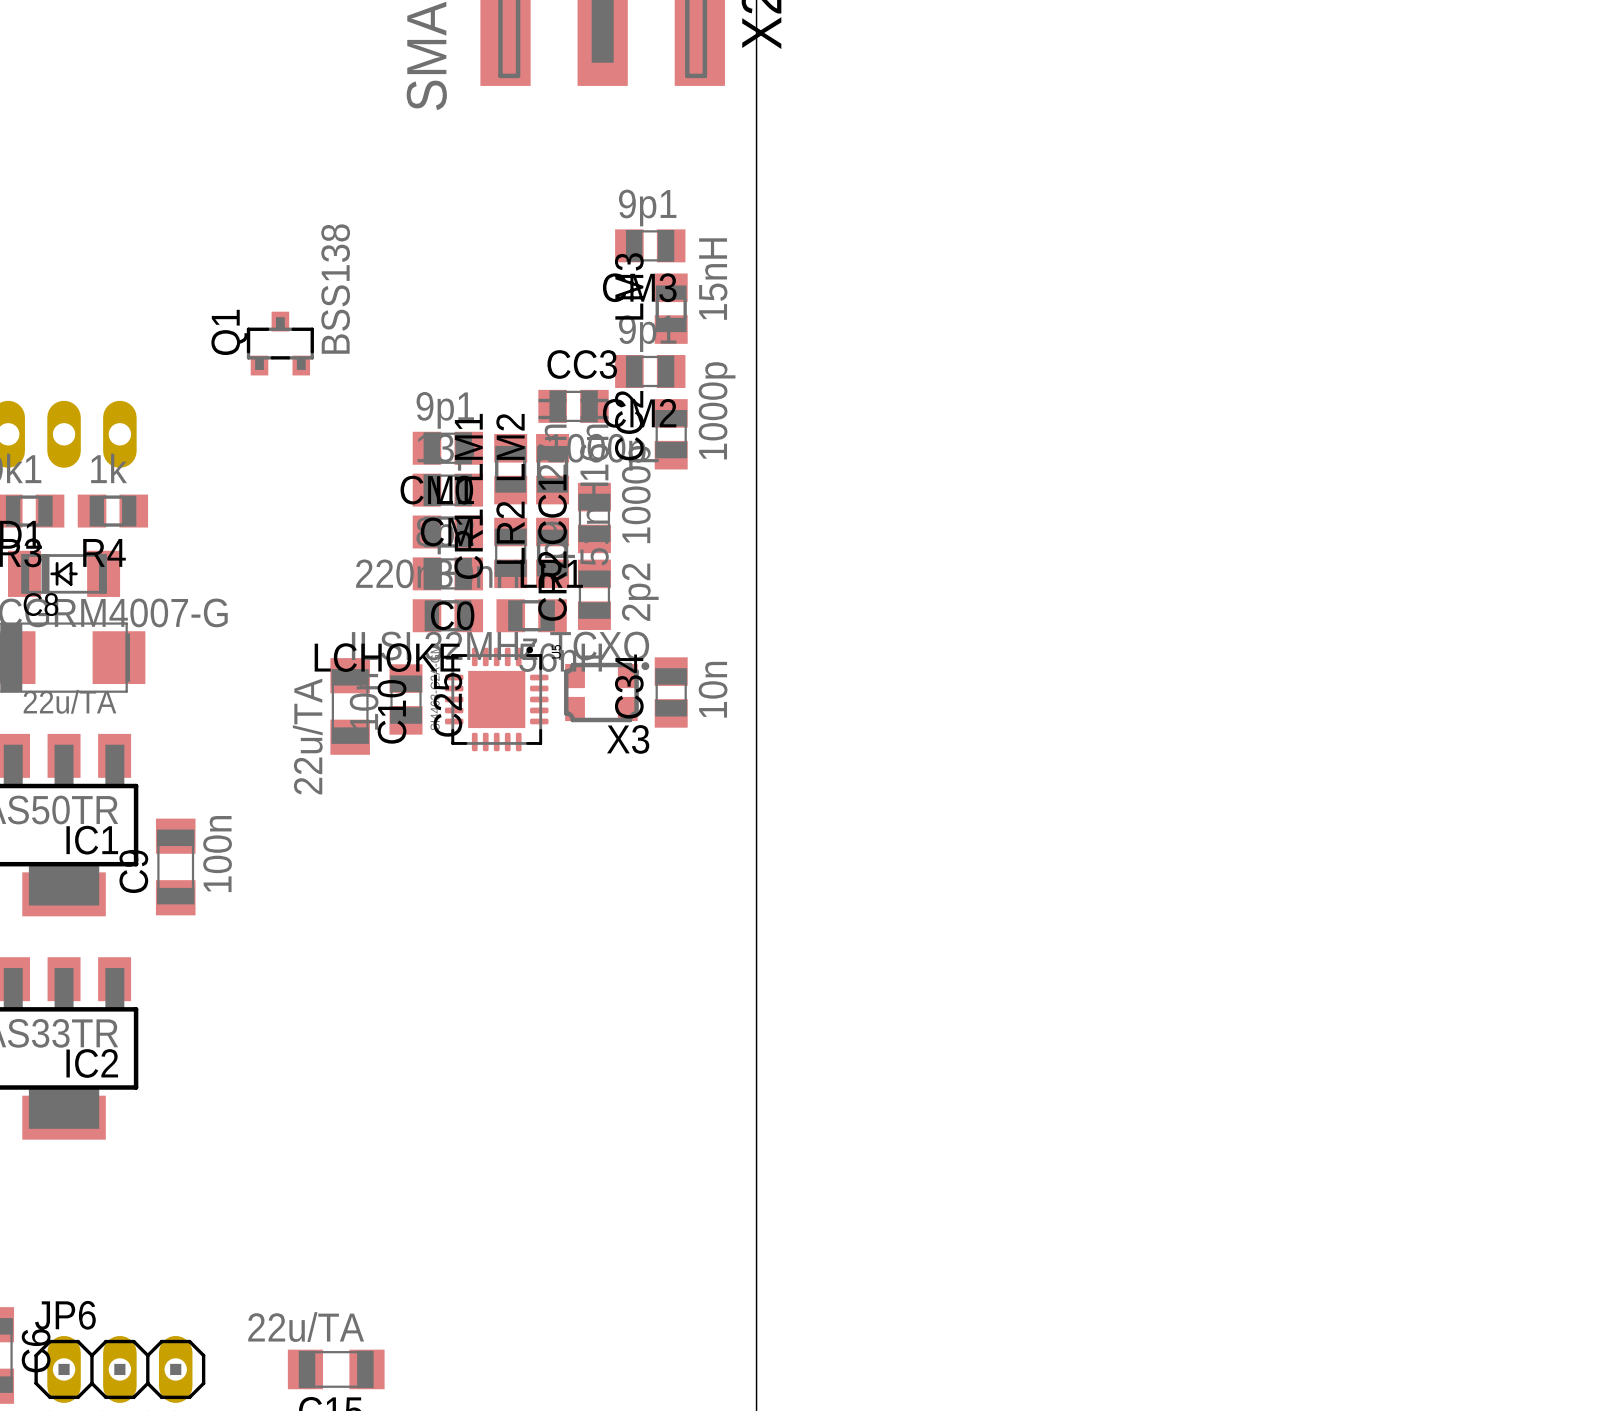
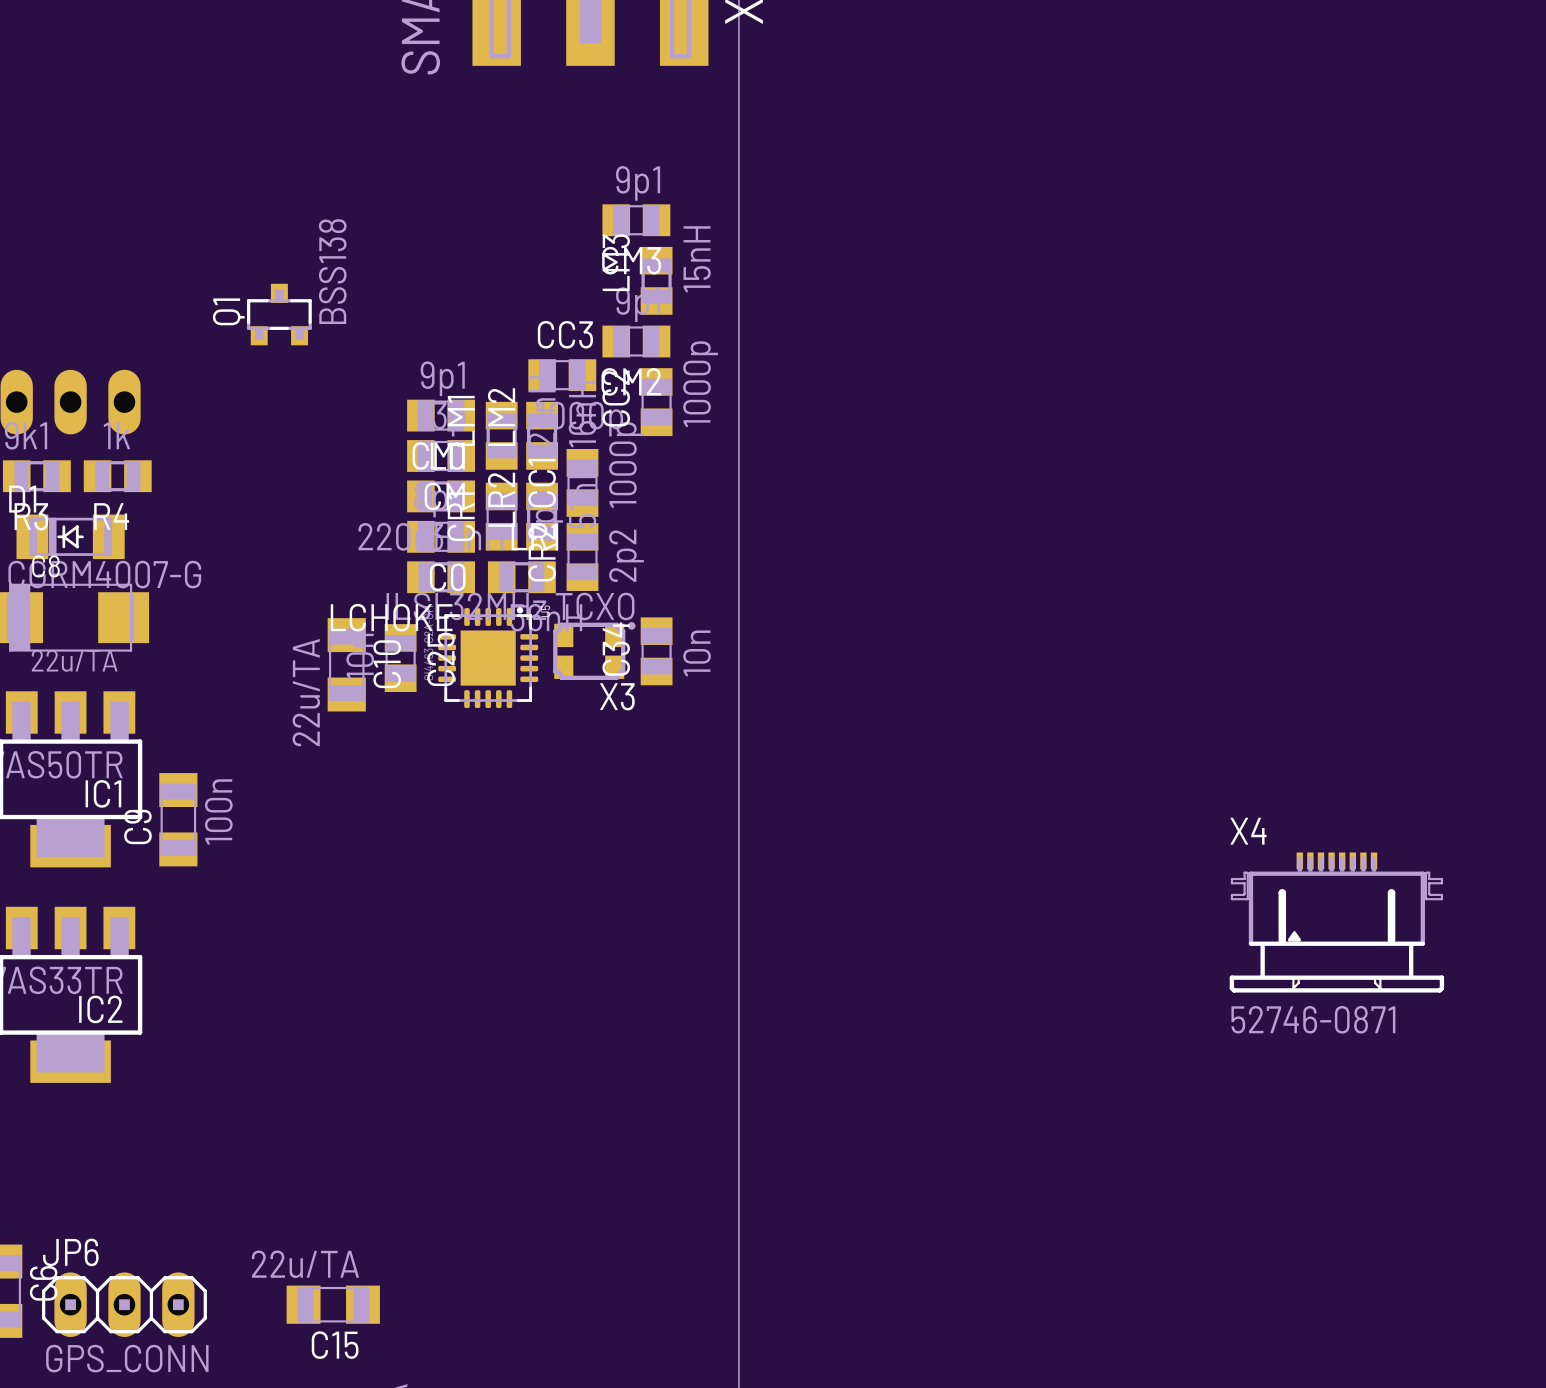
X4: none -> 52746-0871 (1336, 922)

